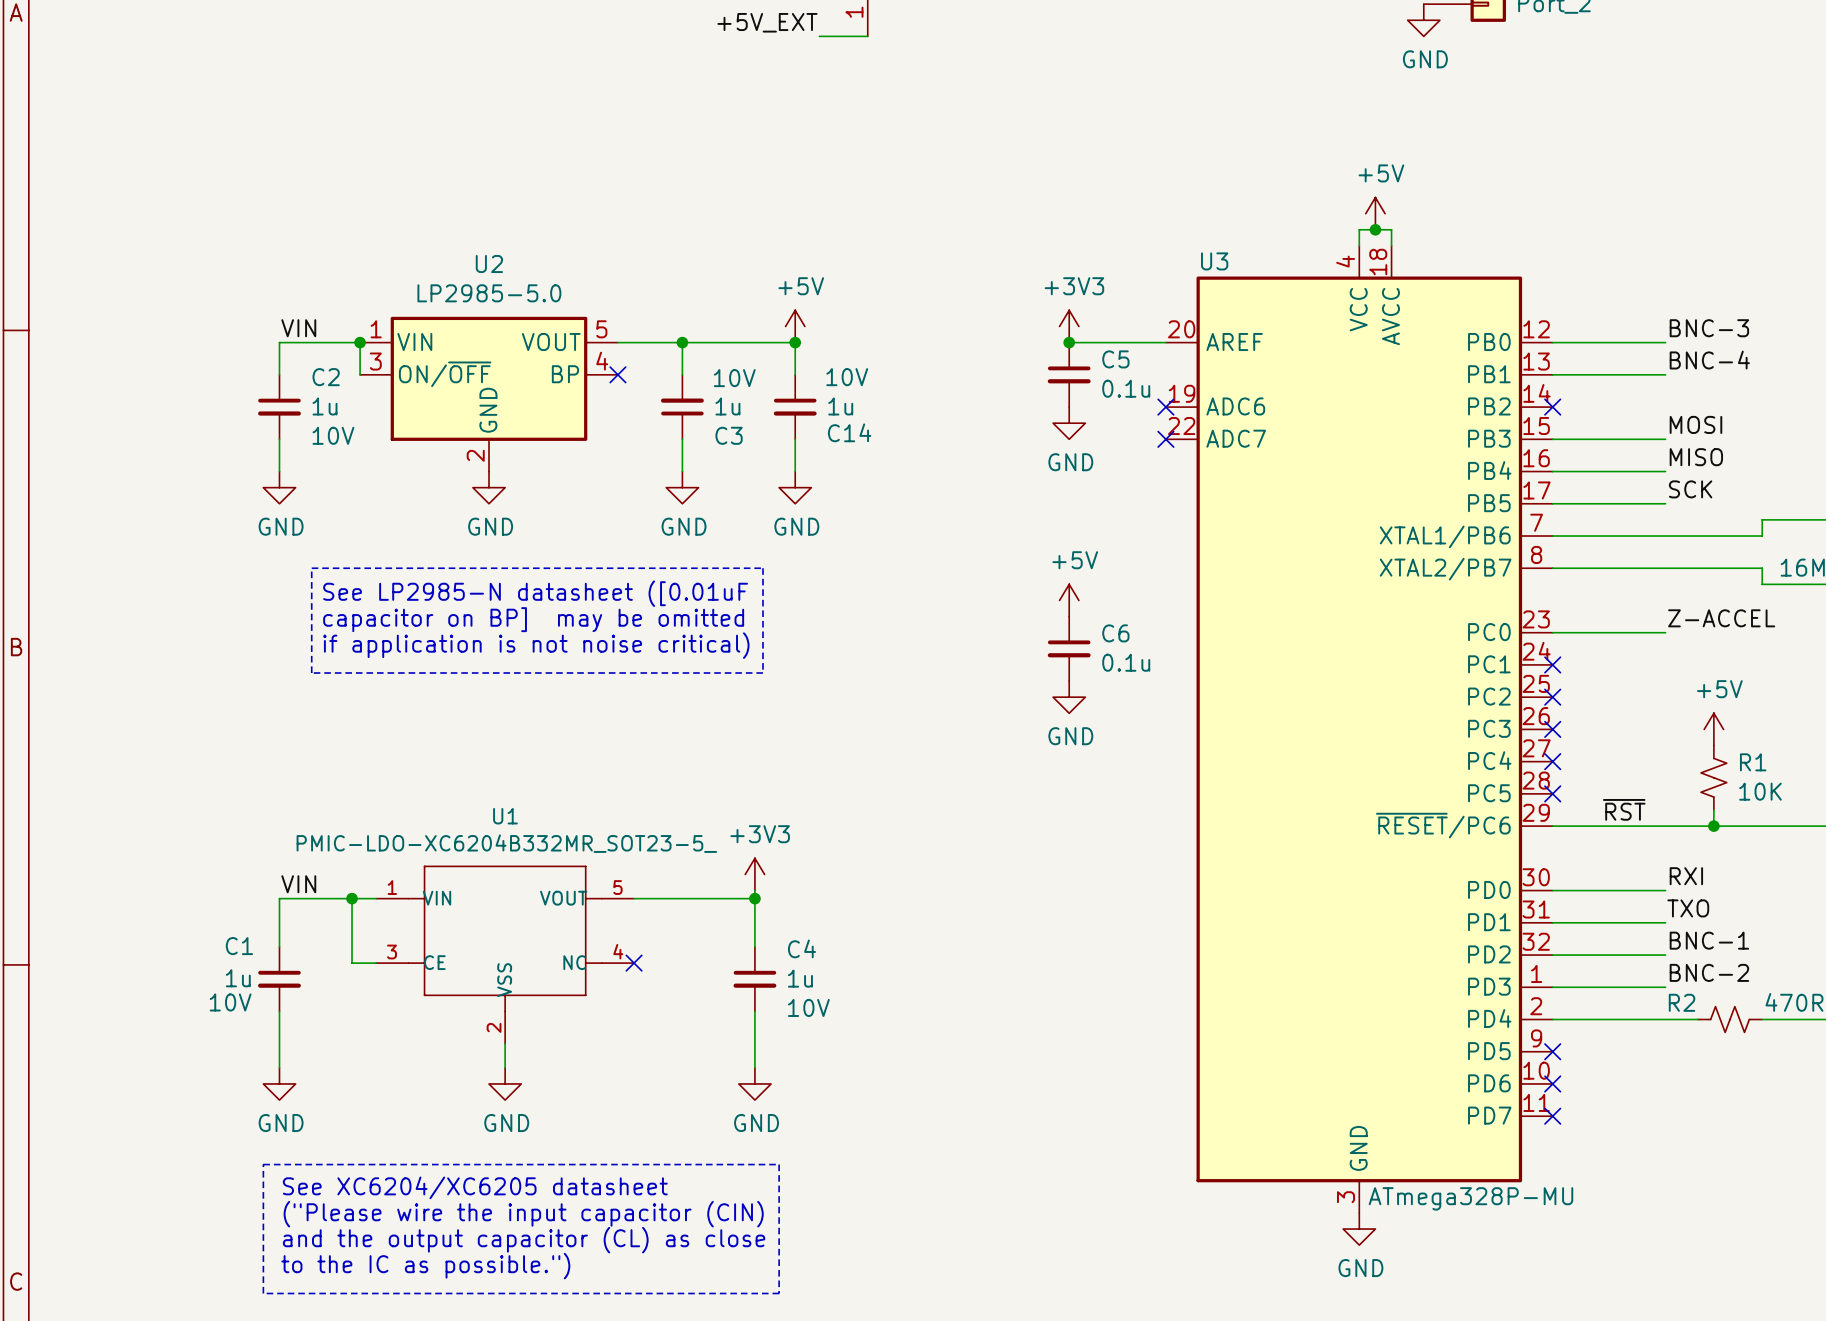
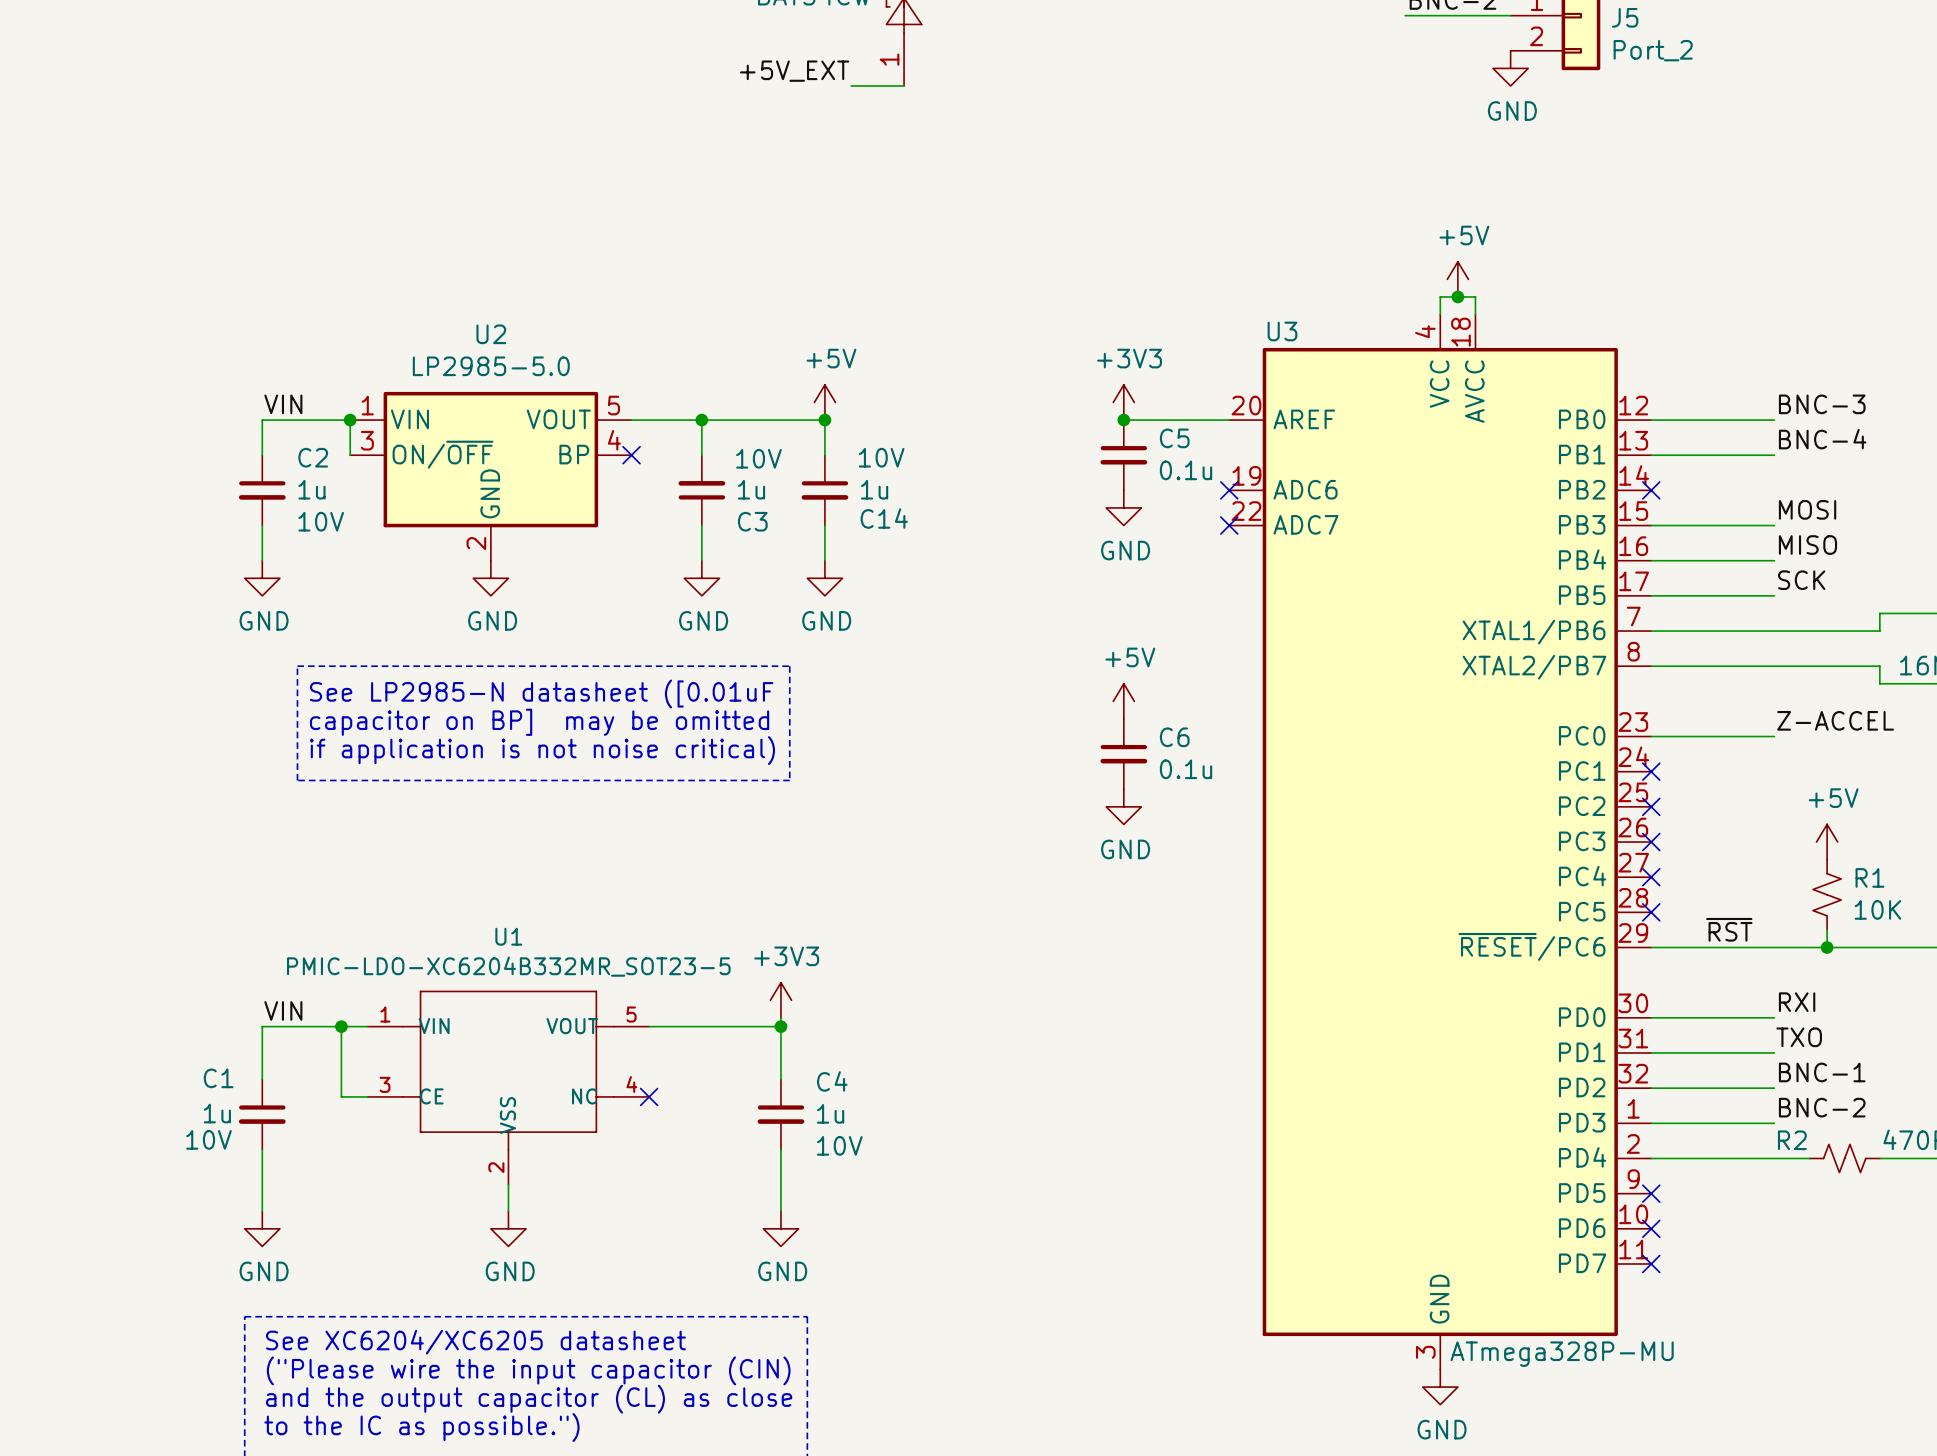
U1 value: PMIC-LDO-XC6204B332MR_SOT23-5_ (506, 843) -> PMIC-LDO-XC6204B332MR_SOT23-5 (508, 966)

